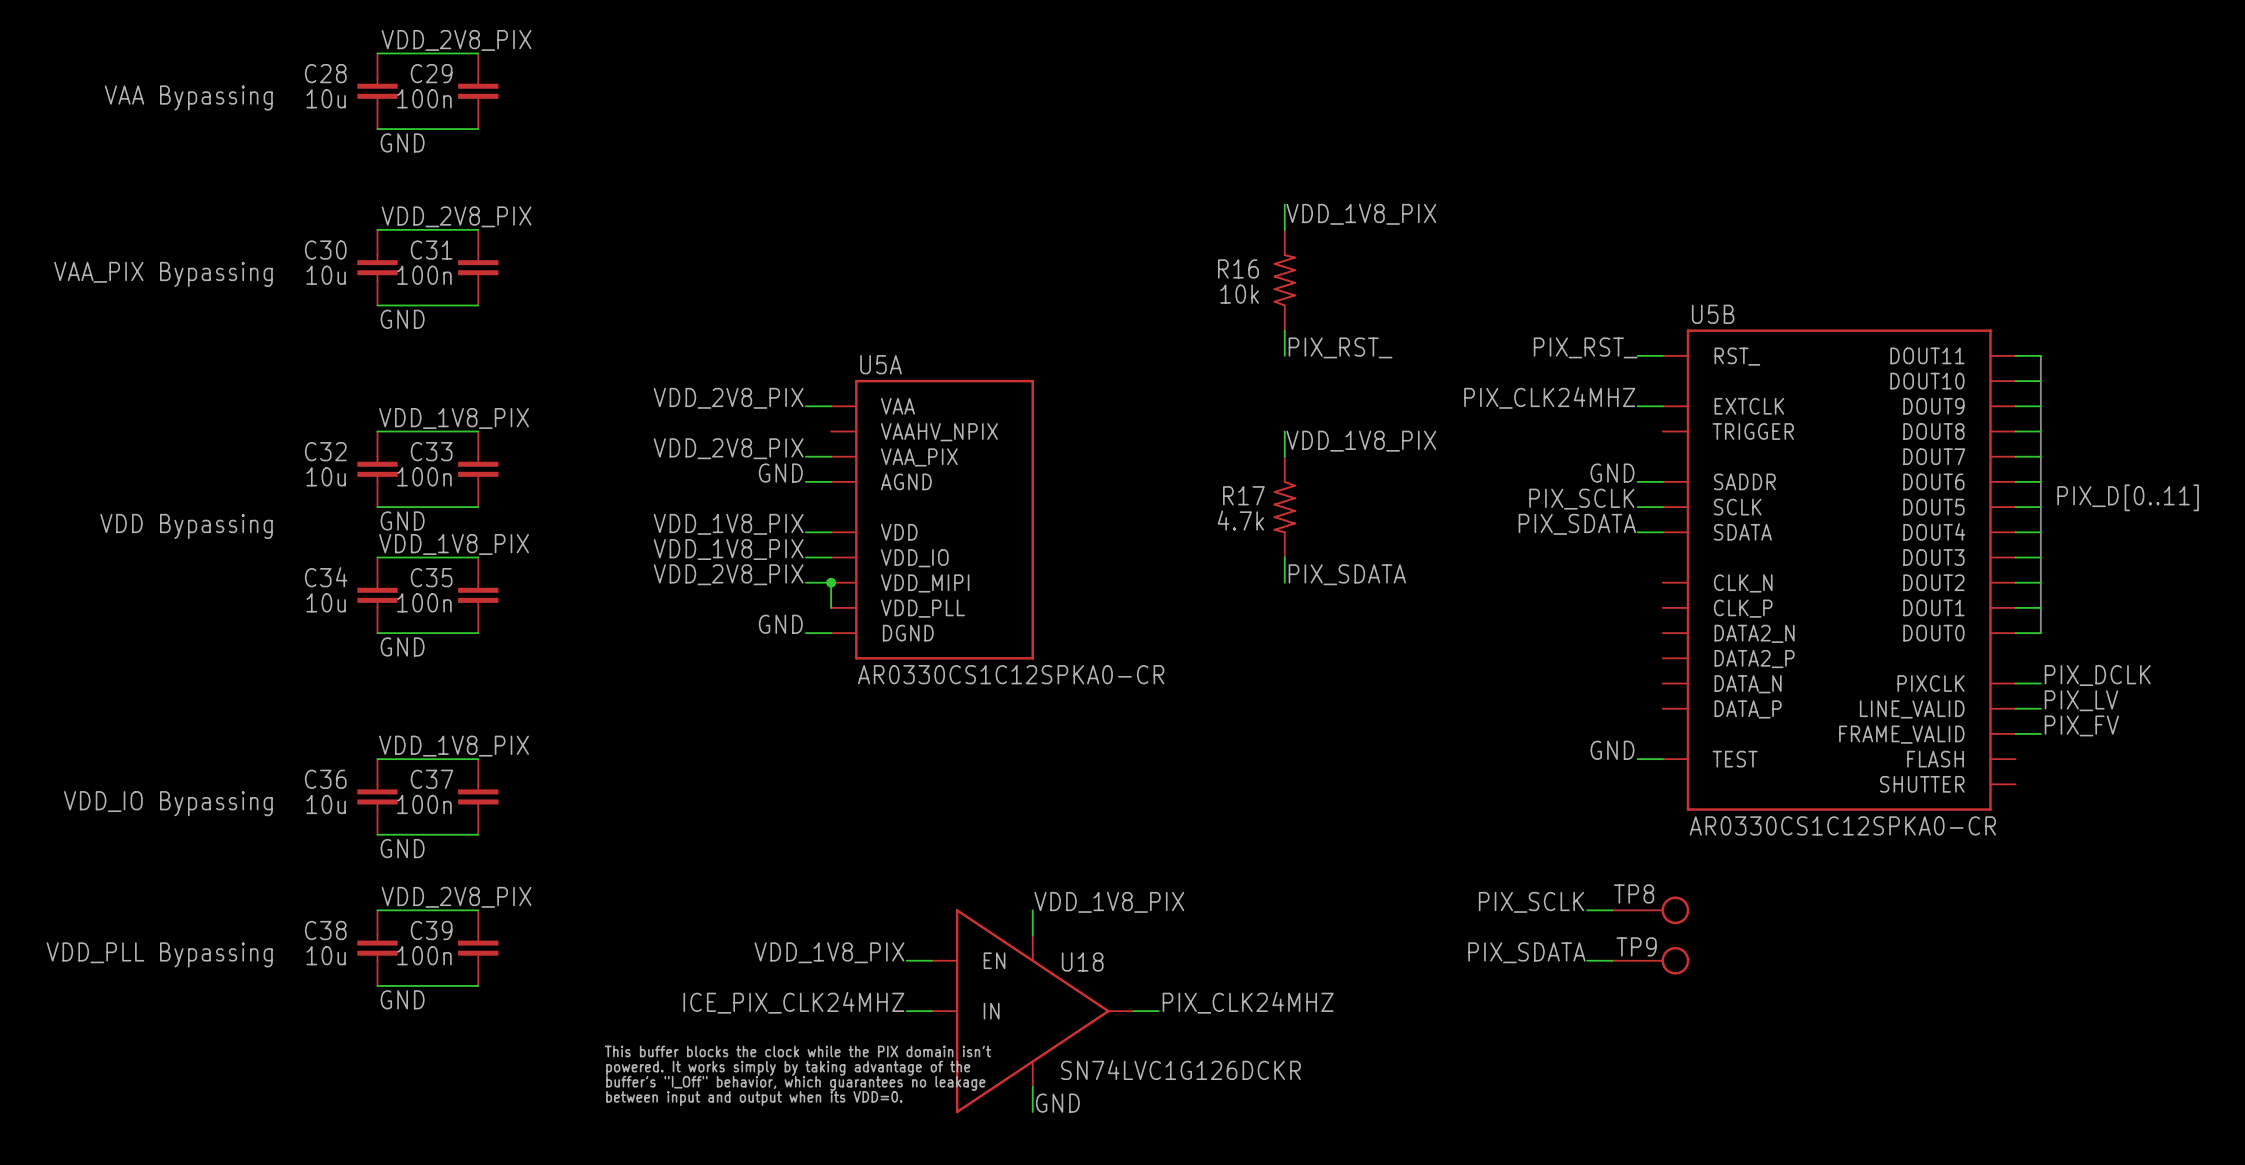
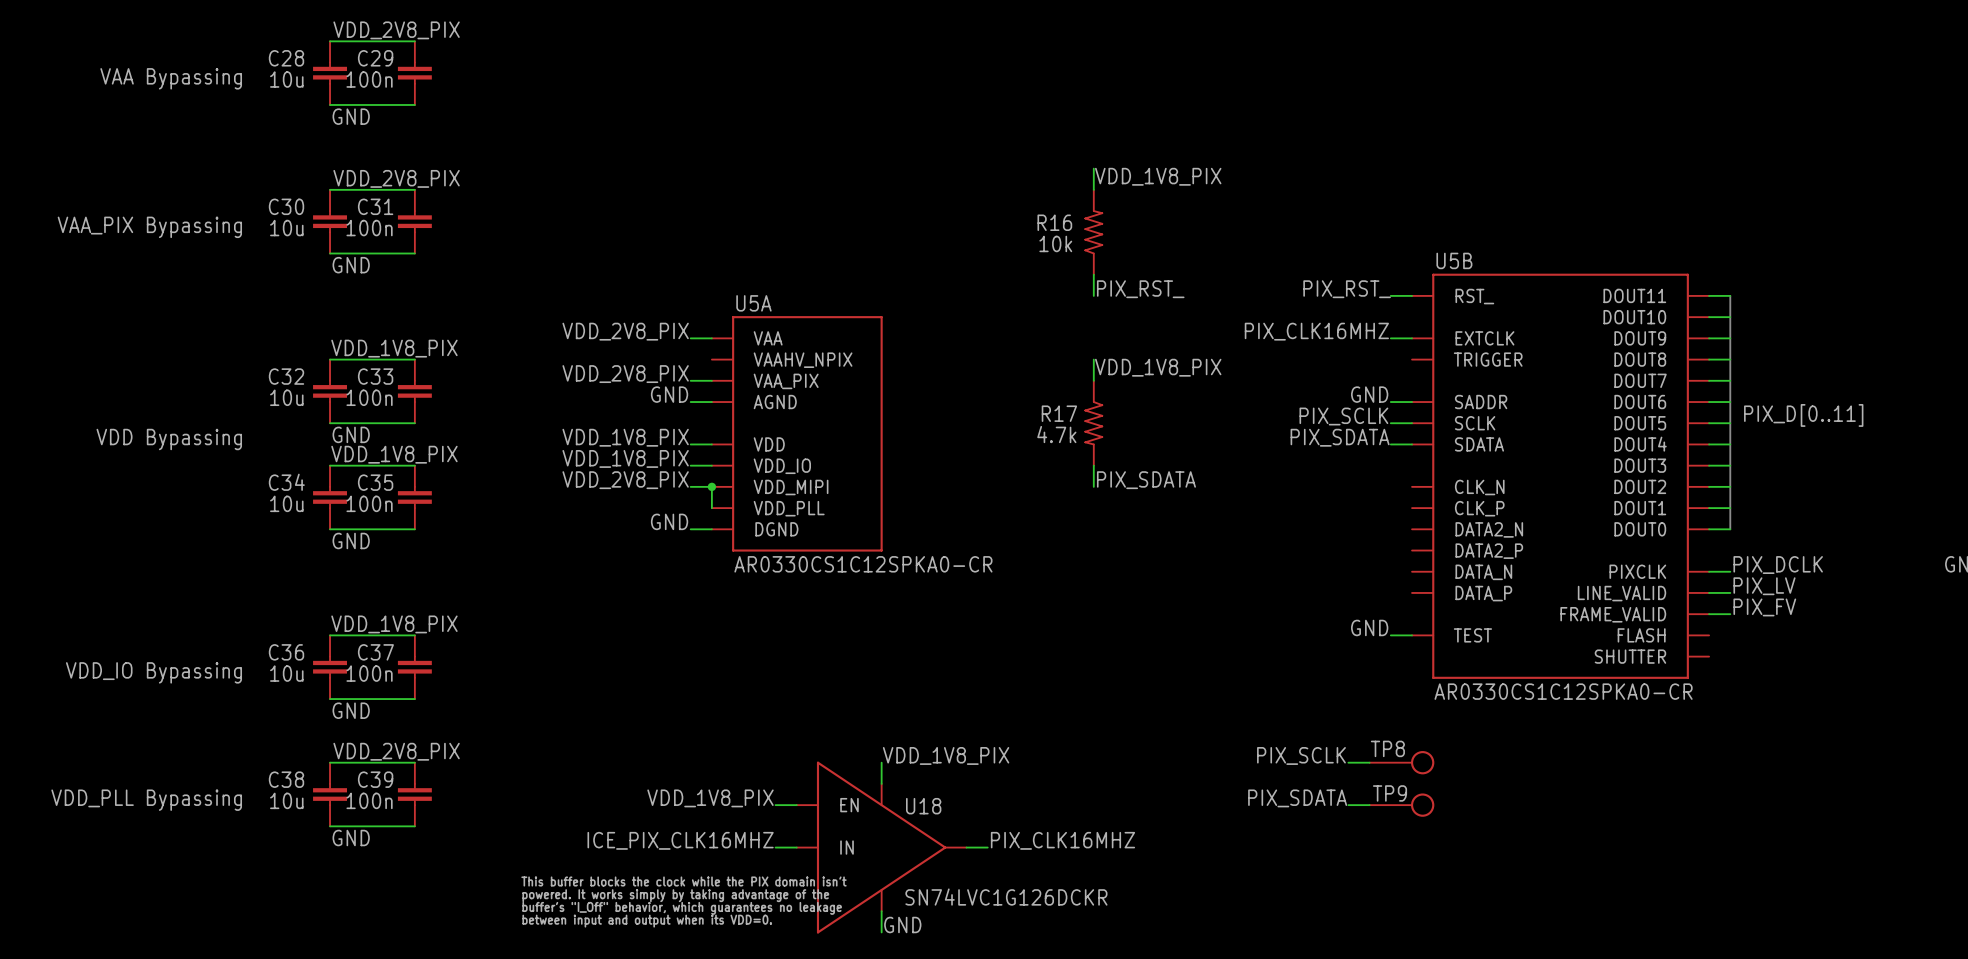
label: PIX_CLK24MHZ (1549, 397) -> PIX_CLK16MHZ (1316, 331)
label: ICE_PIX_CLK24MHZ (793, 1002) -> ICE_PIX_CLK16MHZ (680, 840)
label: PIX_CLK24MHZ (1248, 1002) -> PIX_CLK16MHZ (1062, 840)

